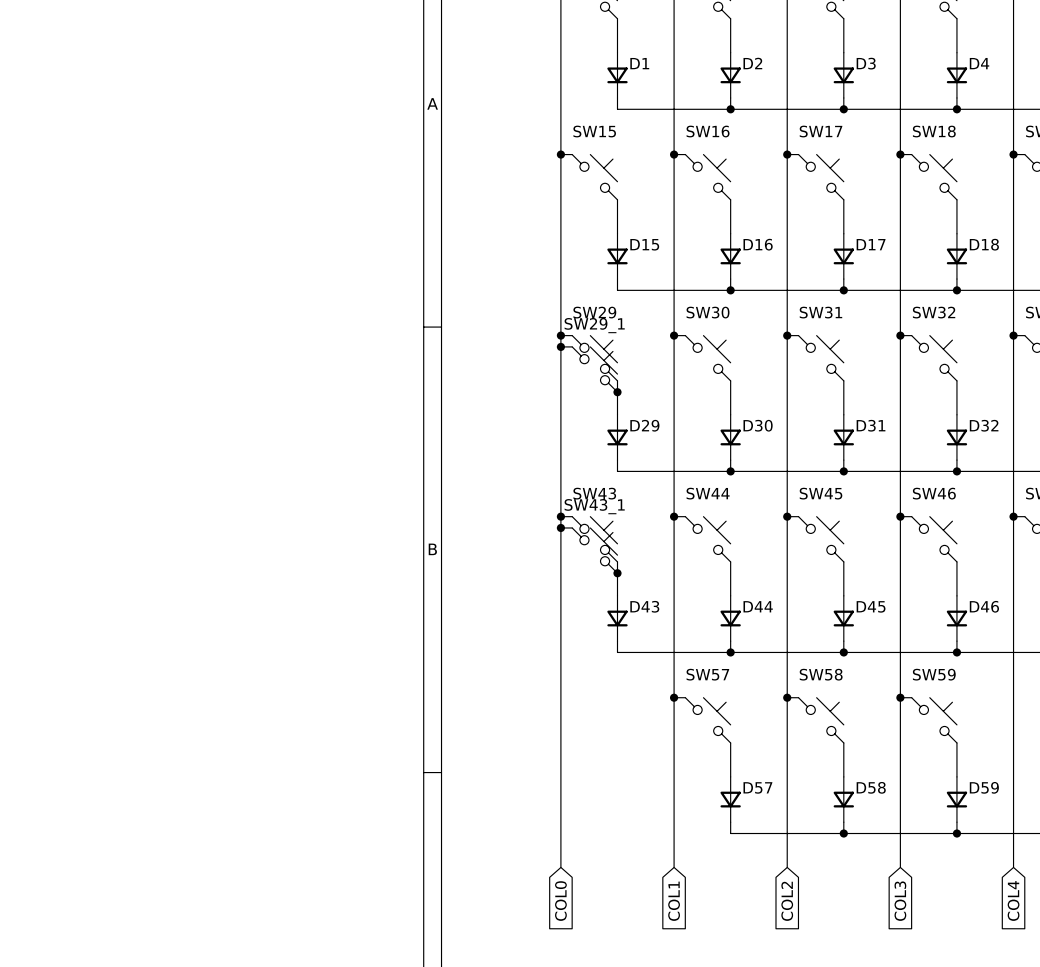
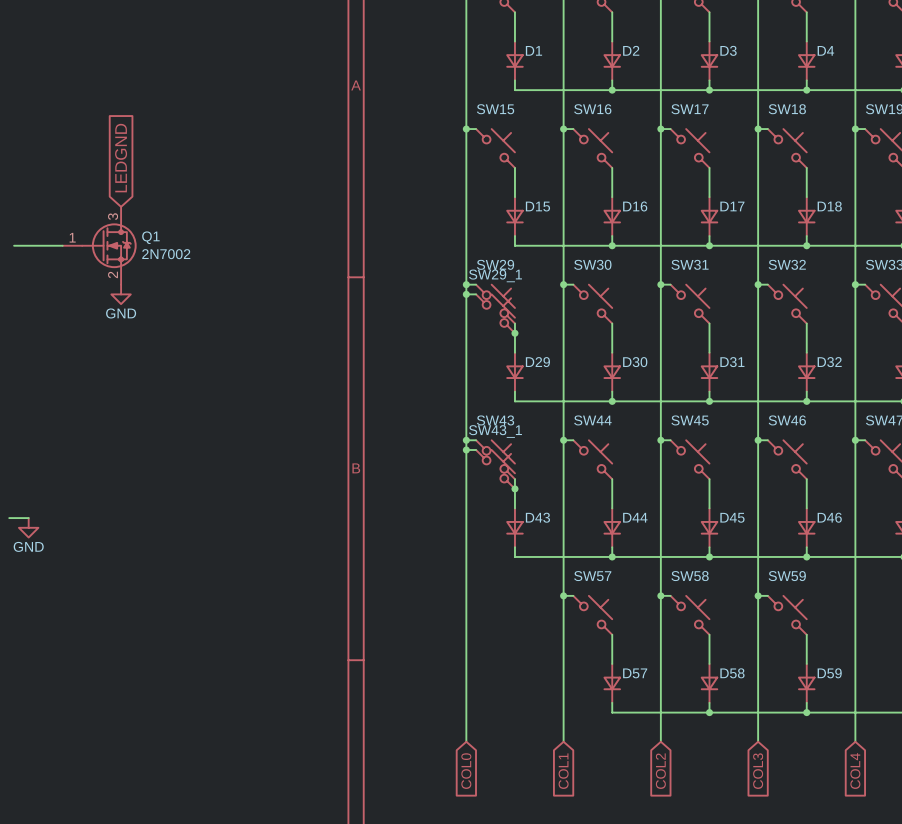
global label: none -> LEDGND (121, 158)
wire: none -> (14, 245) (62, 245)
Q1: none -> 2N7002 (99, 245)
power symbol: none -> GND (121, 294)
wire: none -> (9, 518) (28, 518)
power symbol: none -> GND (28, 527)

